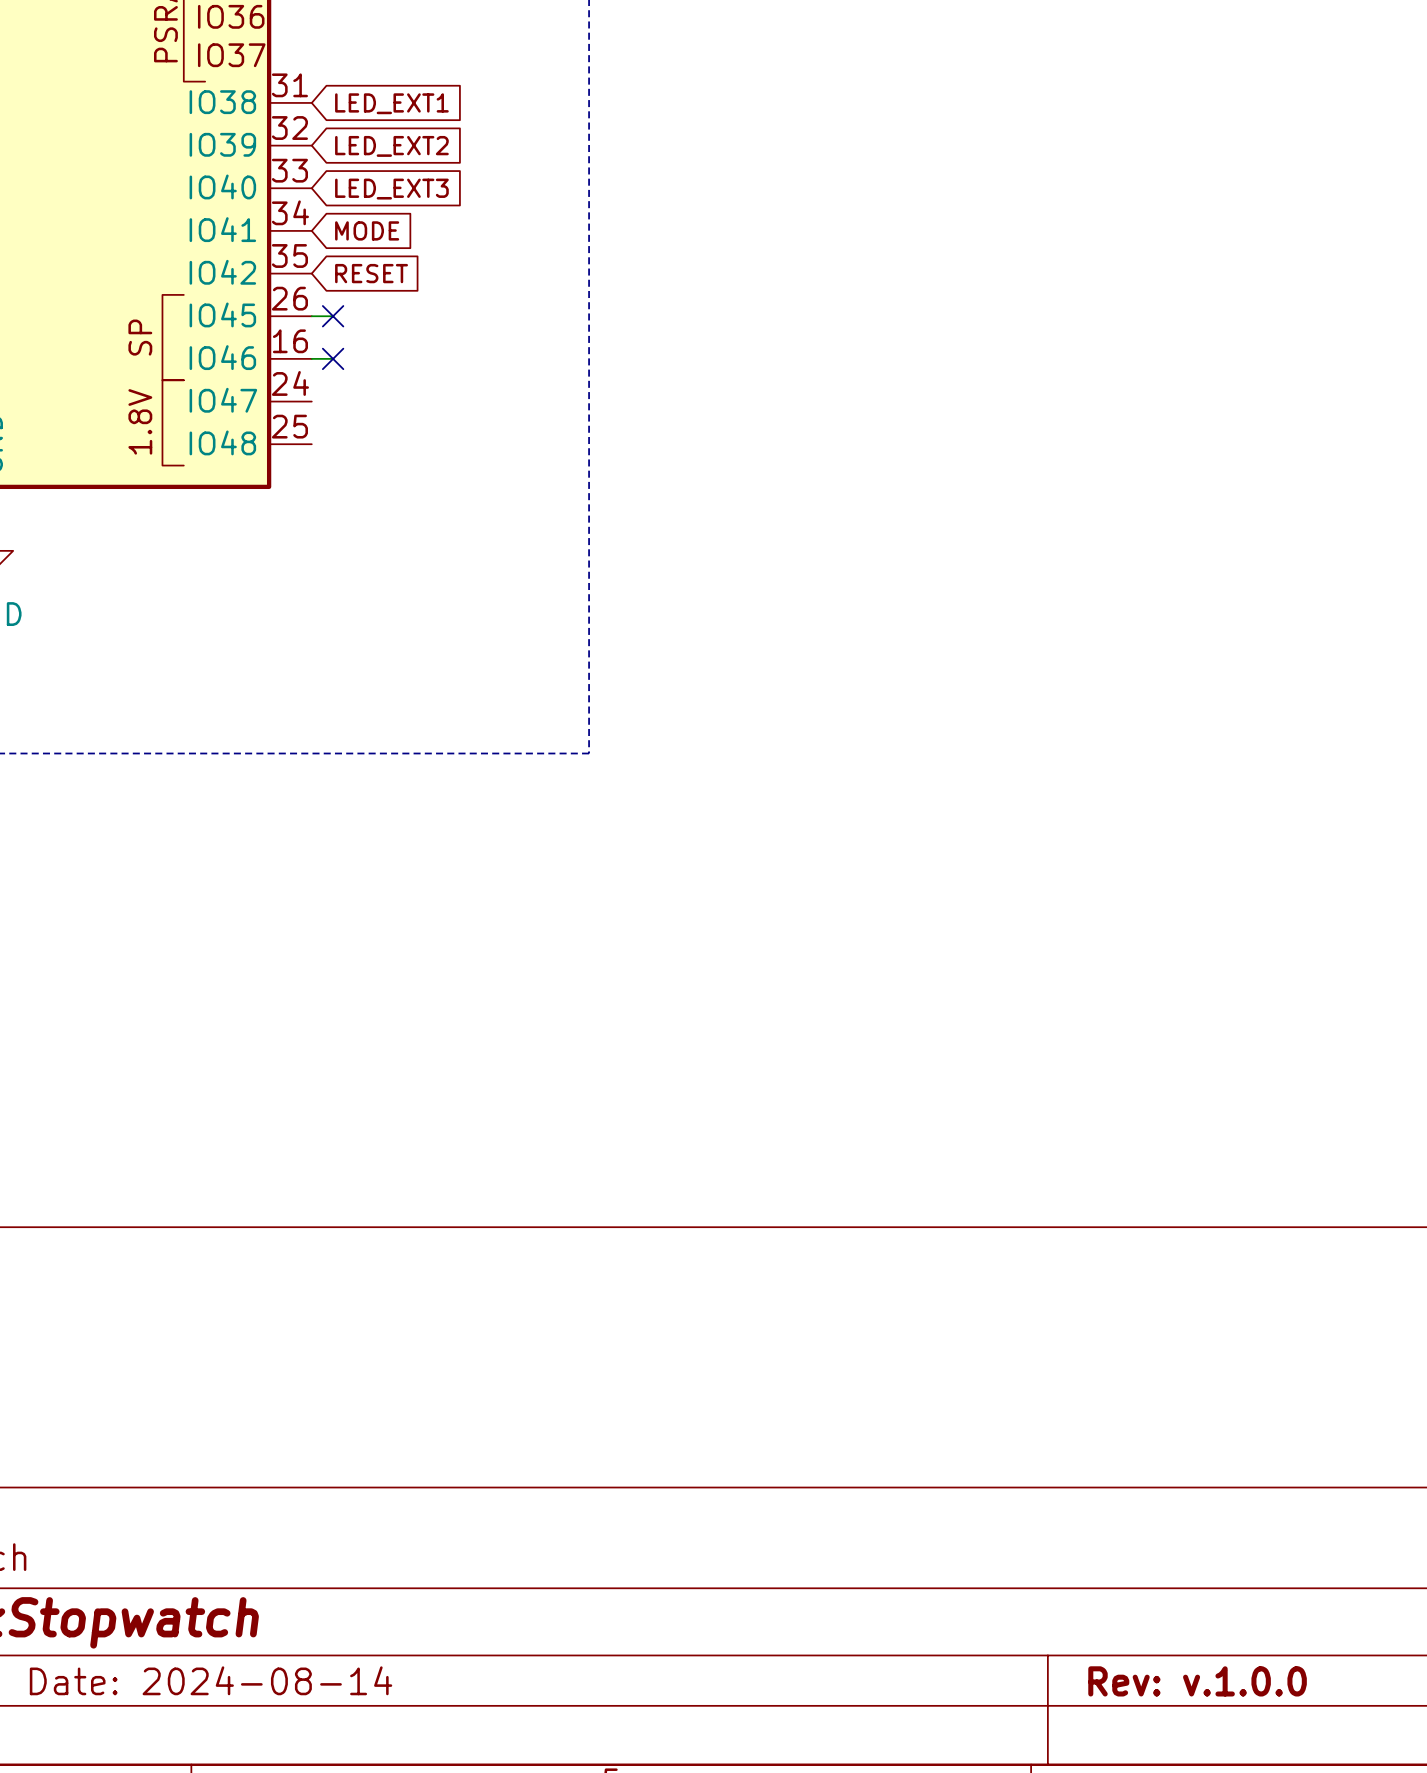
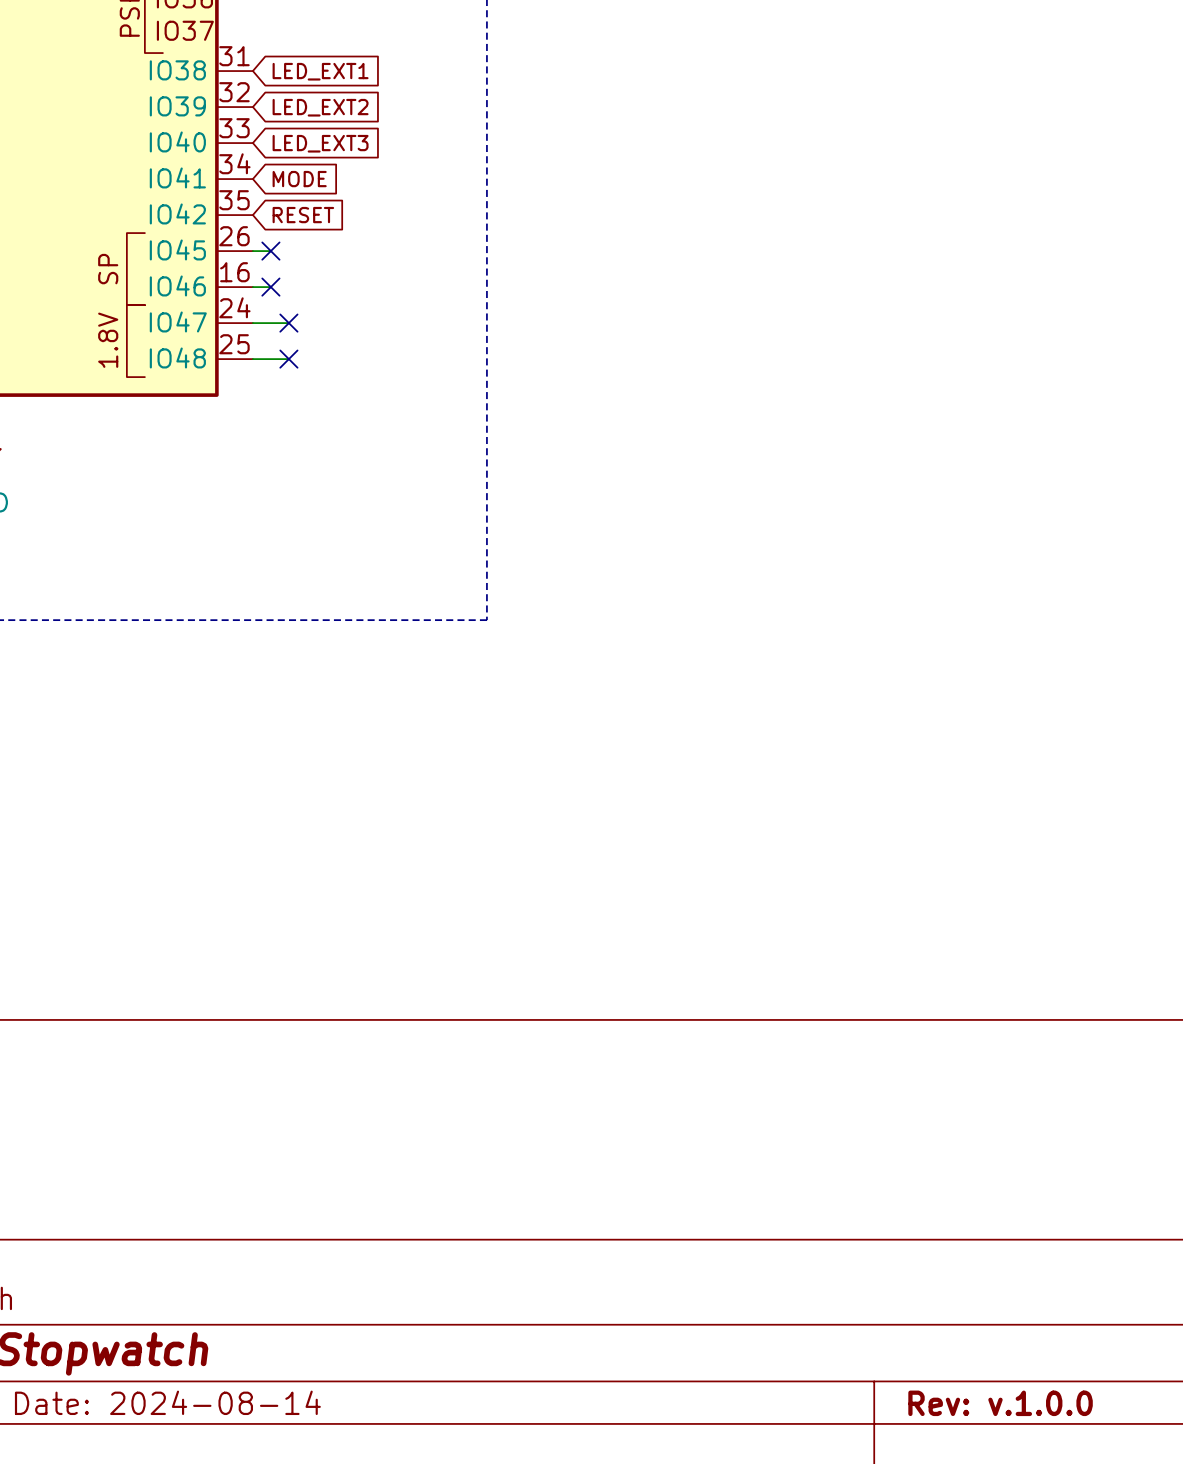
wire: none -> (252, 323) (288, 323)
no-connect mark: none -> (288, 323)
wire: none -> (252, 359) (288, 359)
no-connect mark: none -> (288, 359)

